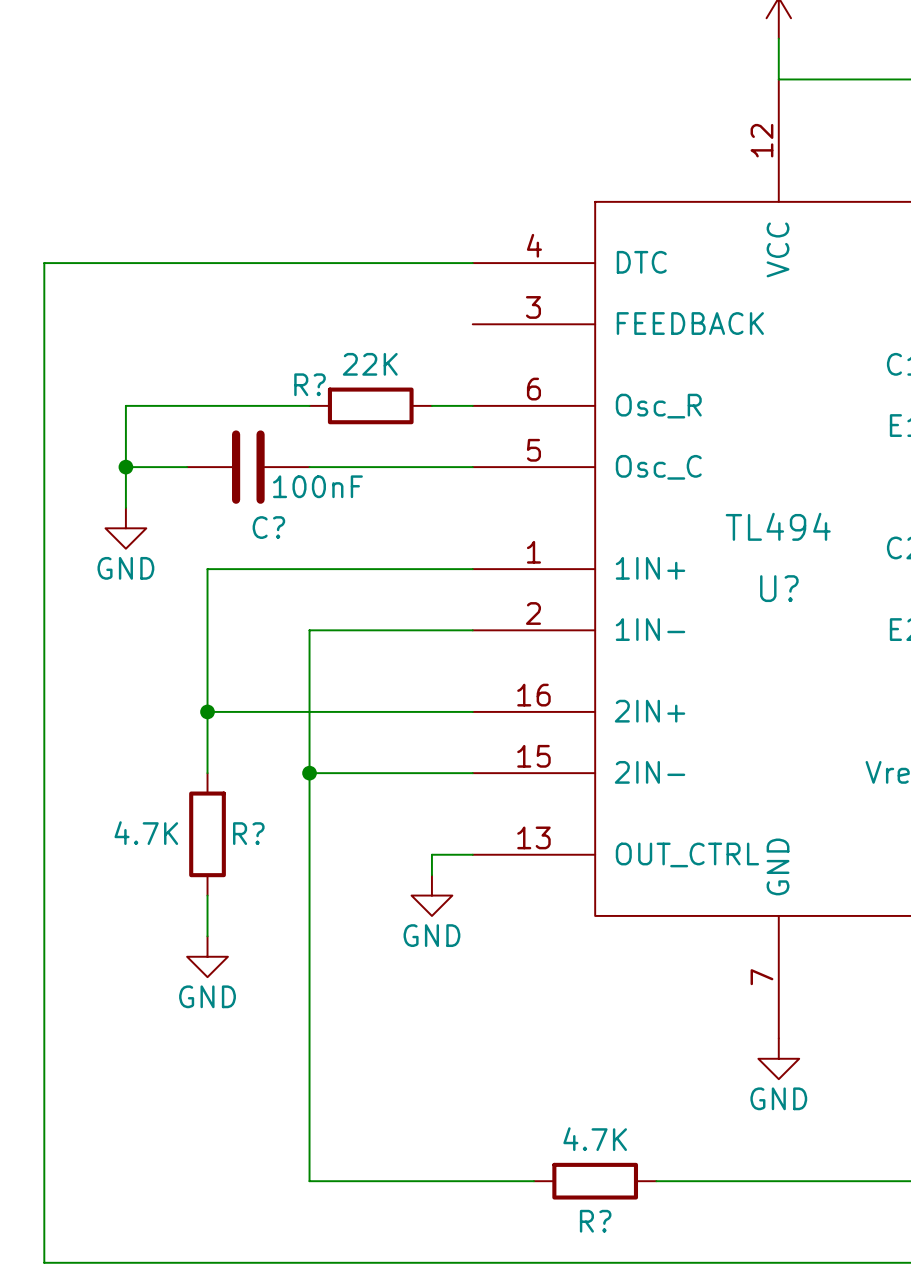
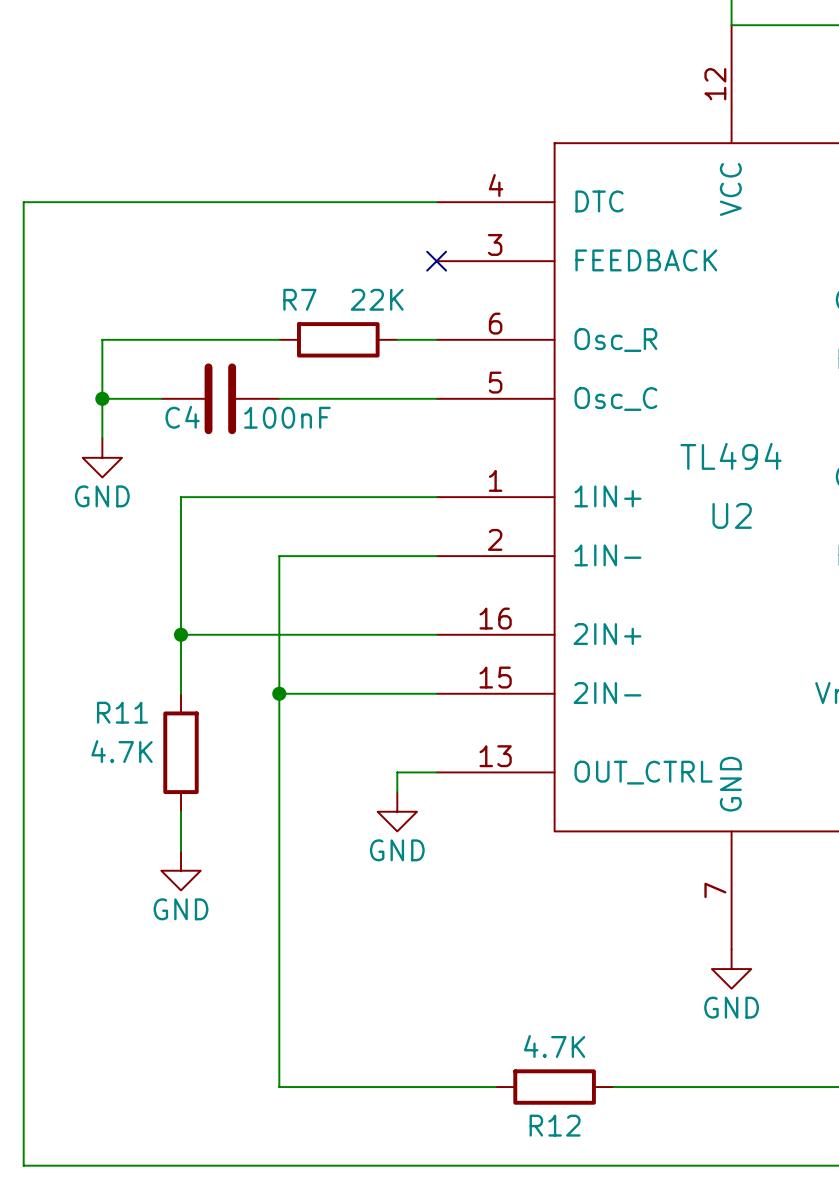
no-connect mark: none -> (436, 261)
R? value position: 22K (370, 364) -> 22K (377, 299)
R? name: R? (310, 384) -> R7 (299, 299)
C? name: C? (268, 527) -> C4 (182, 417)
U? name: U? (779, 588) -> U2 (732, 515)
R? name: R? (248, 833) -> R11 (122, 712)
R? name: R? (595, 1221) -> R12 (555, 1125)

